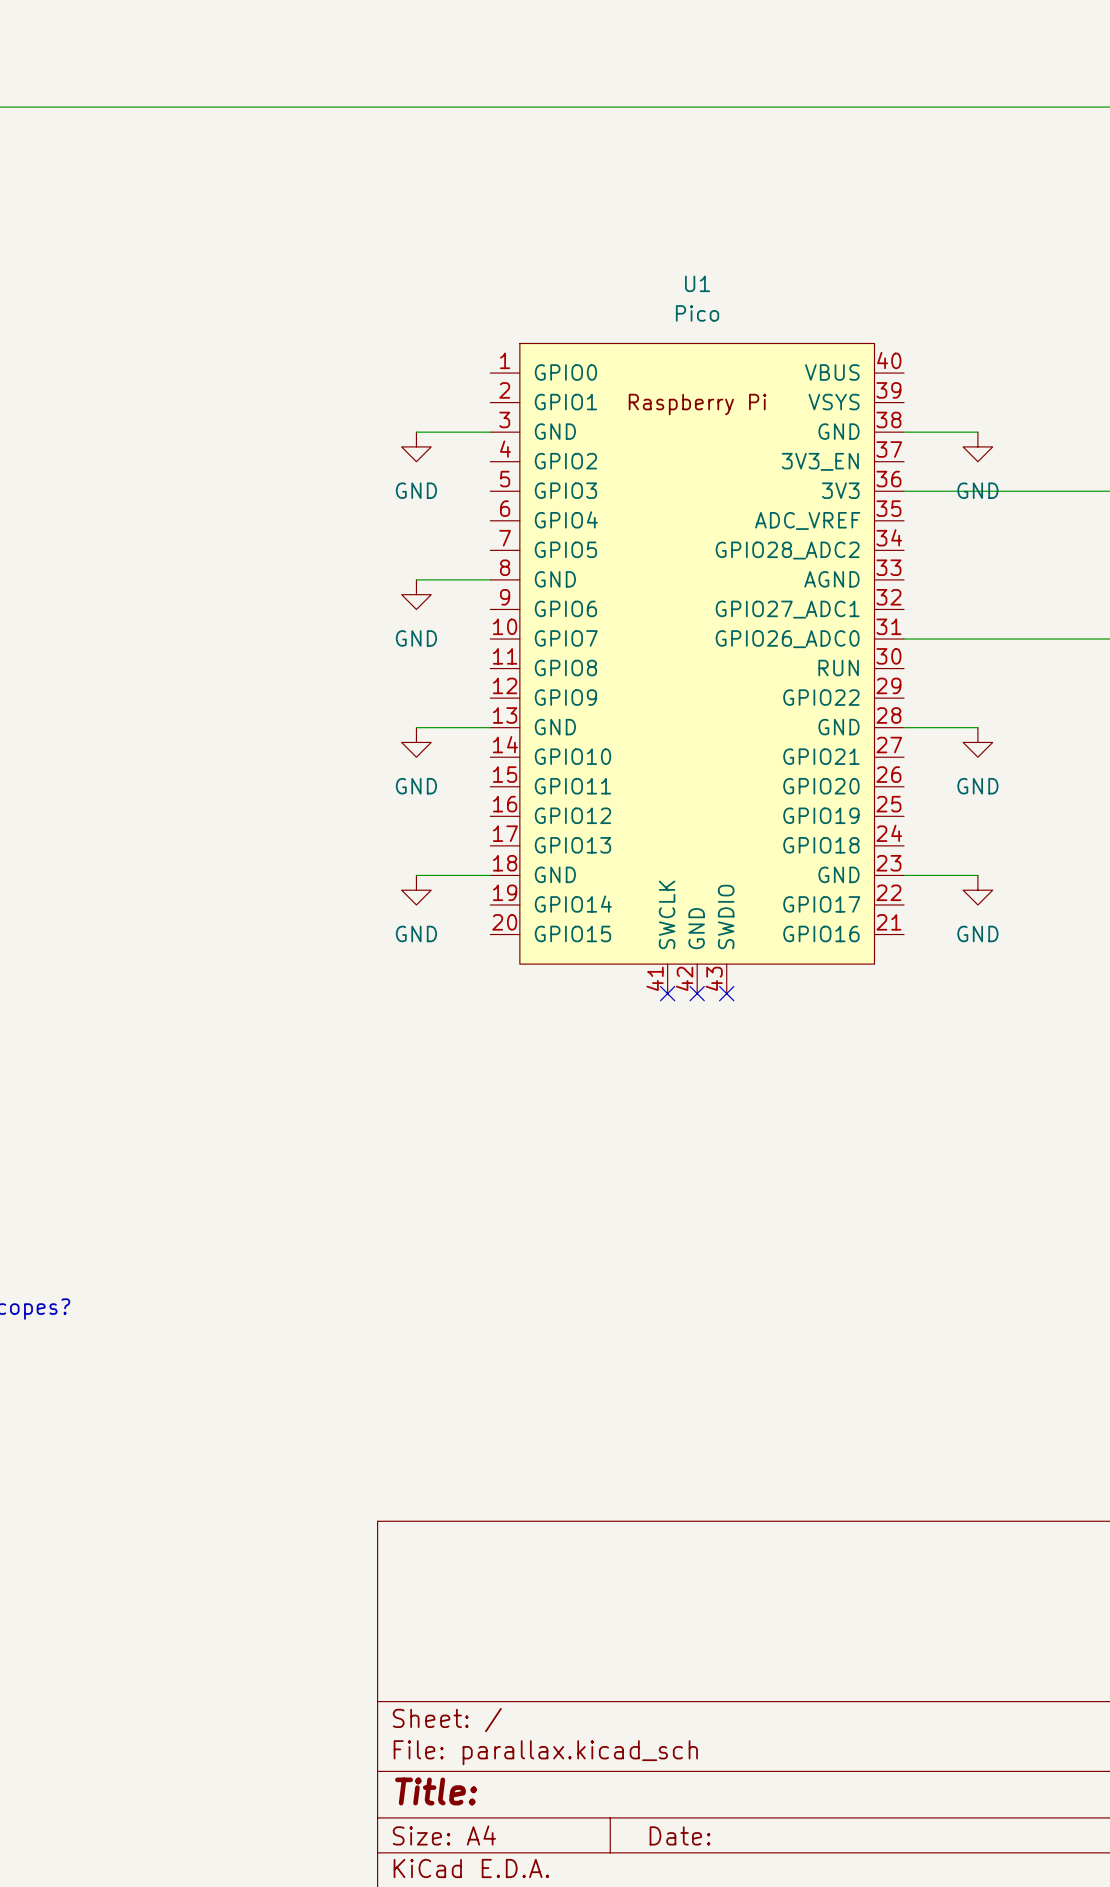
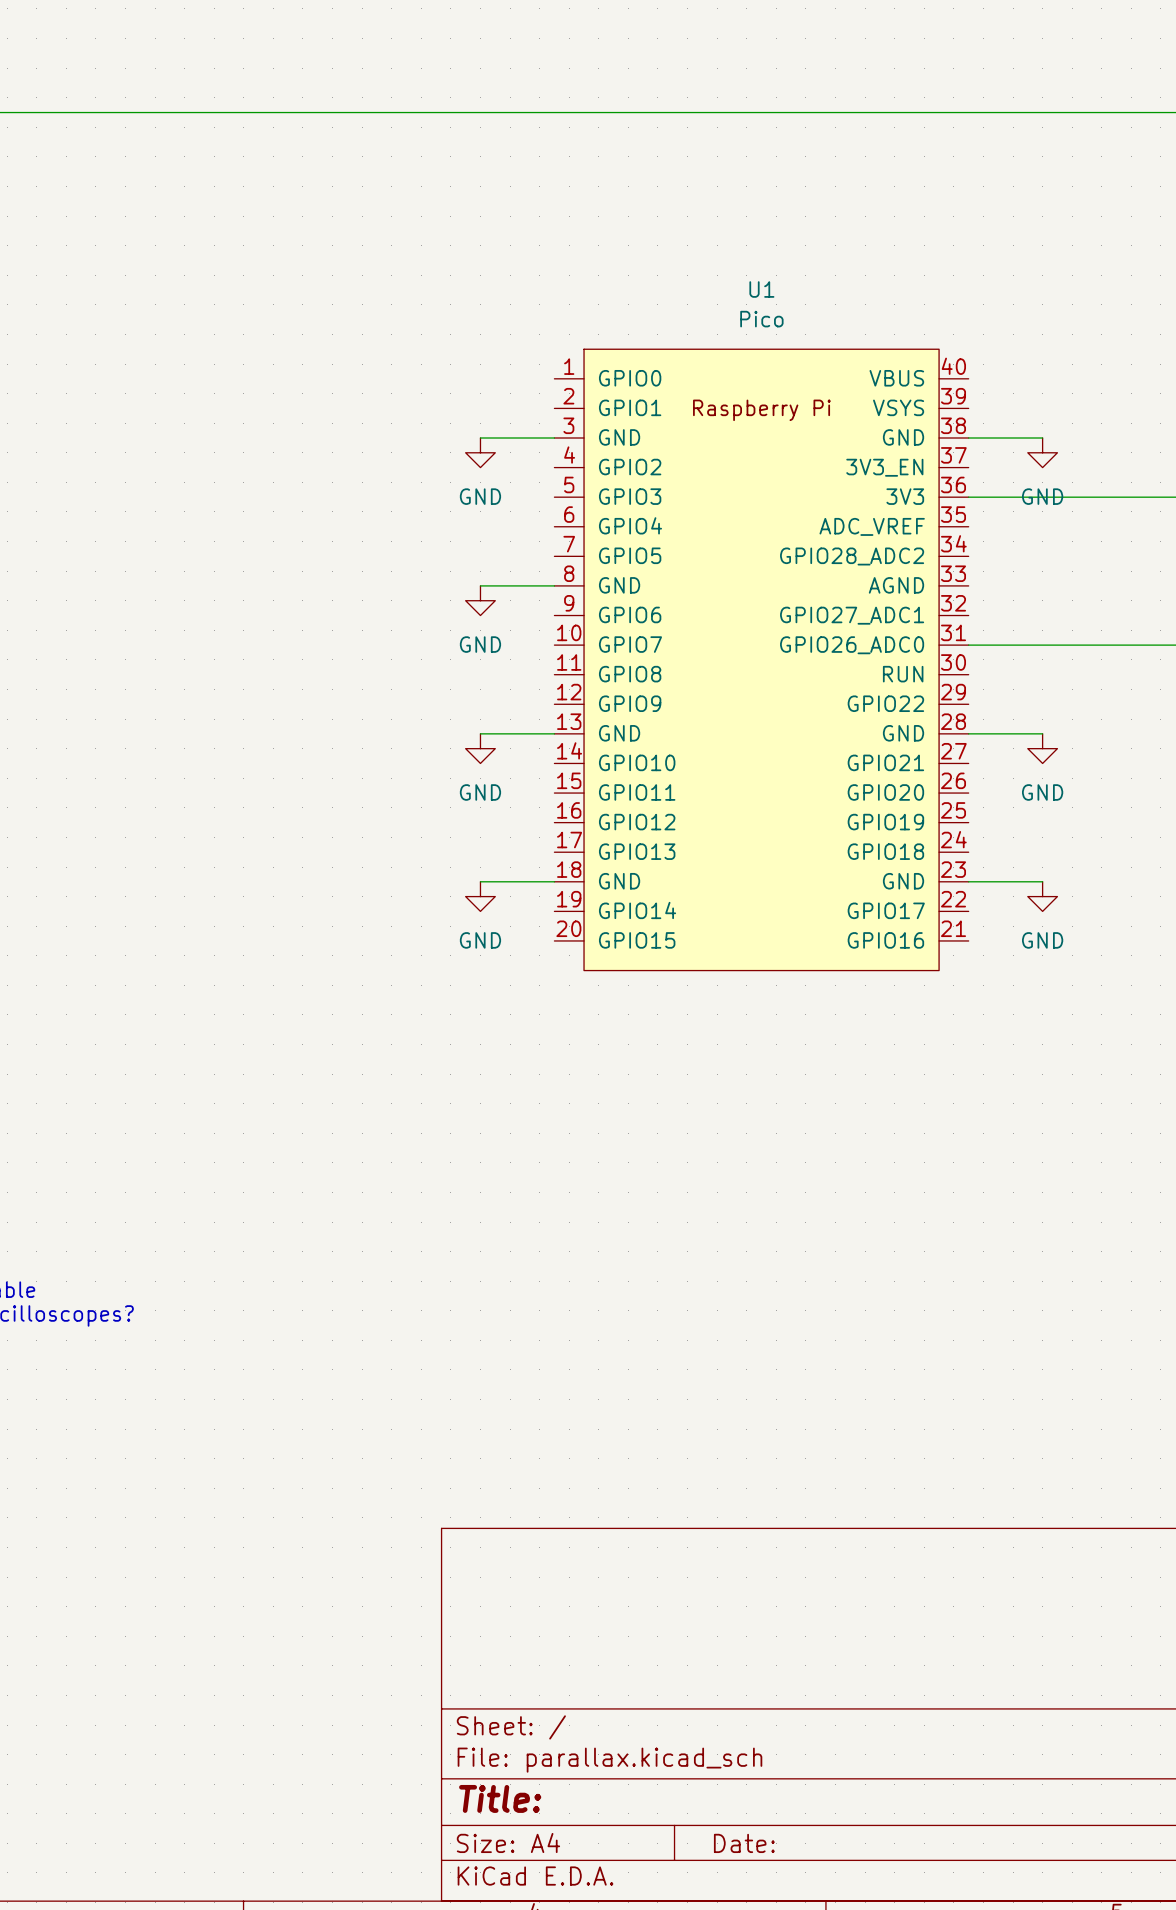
U1 symbol: [490, 343, 905, 994] -> [554, 349, 969, 971]
no-connect mark: (667, 993) -> none
no-connect mark: (697, 993) -> none
no-connect mark: (726, 993) -> none

